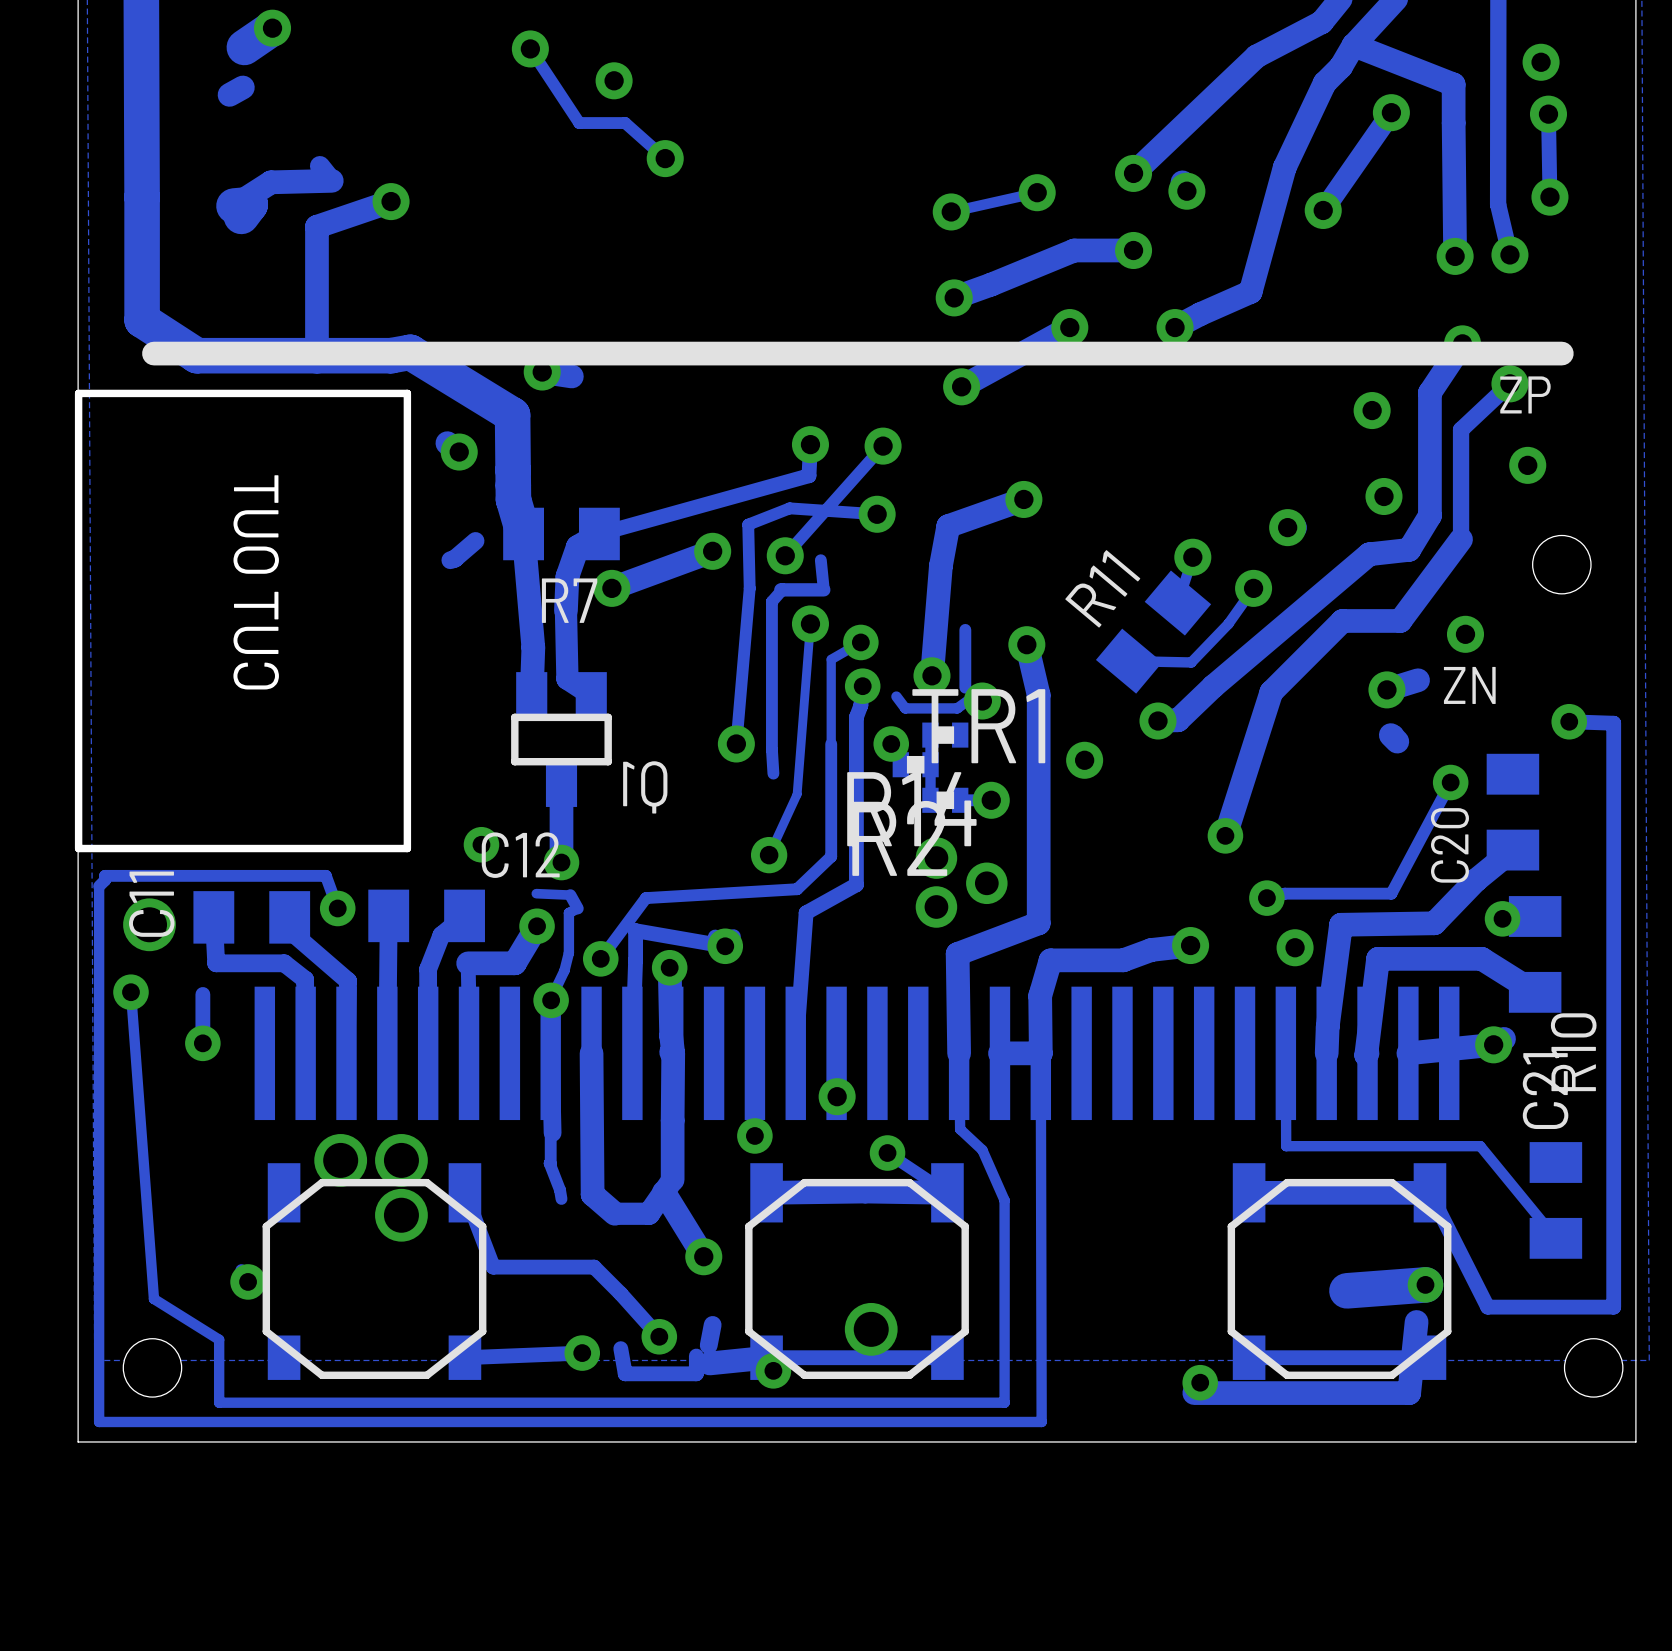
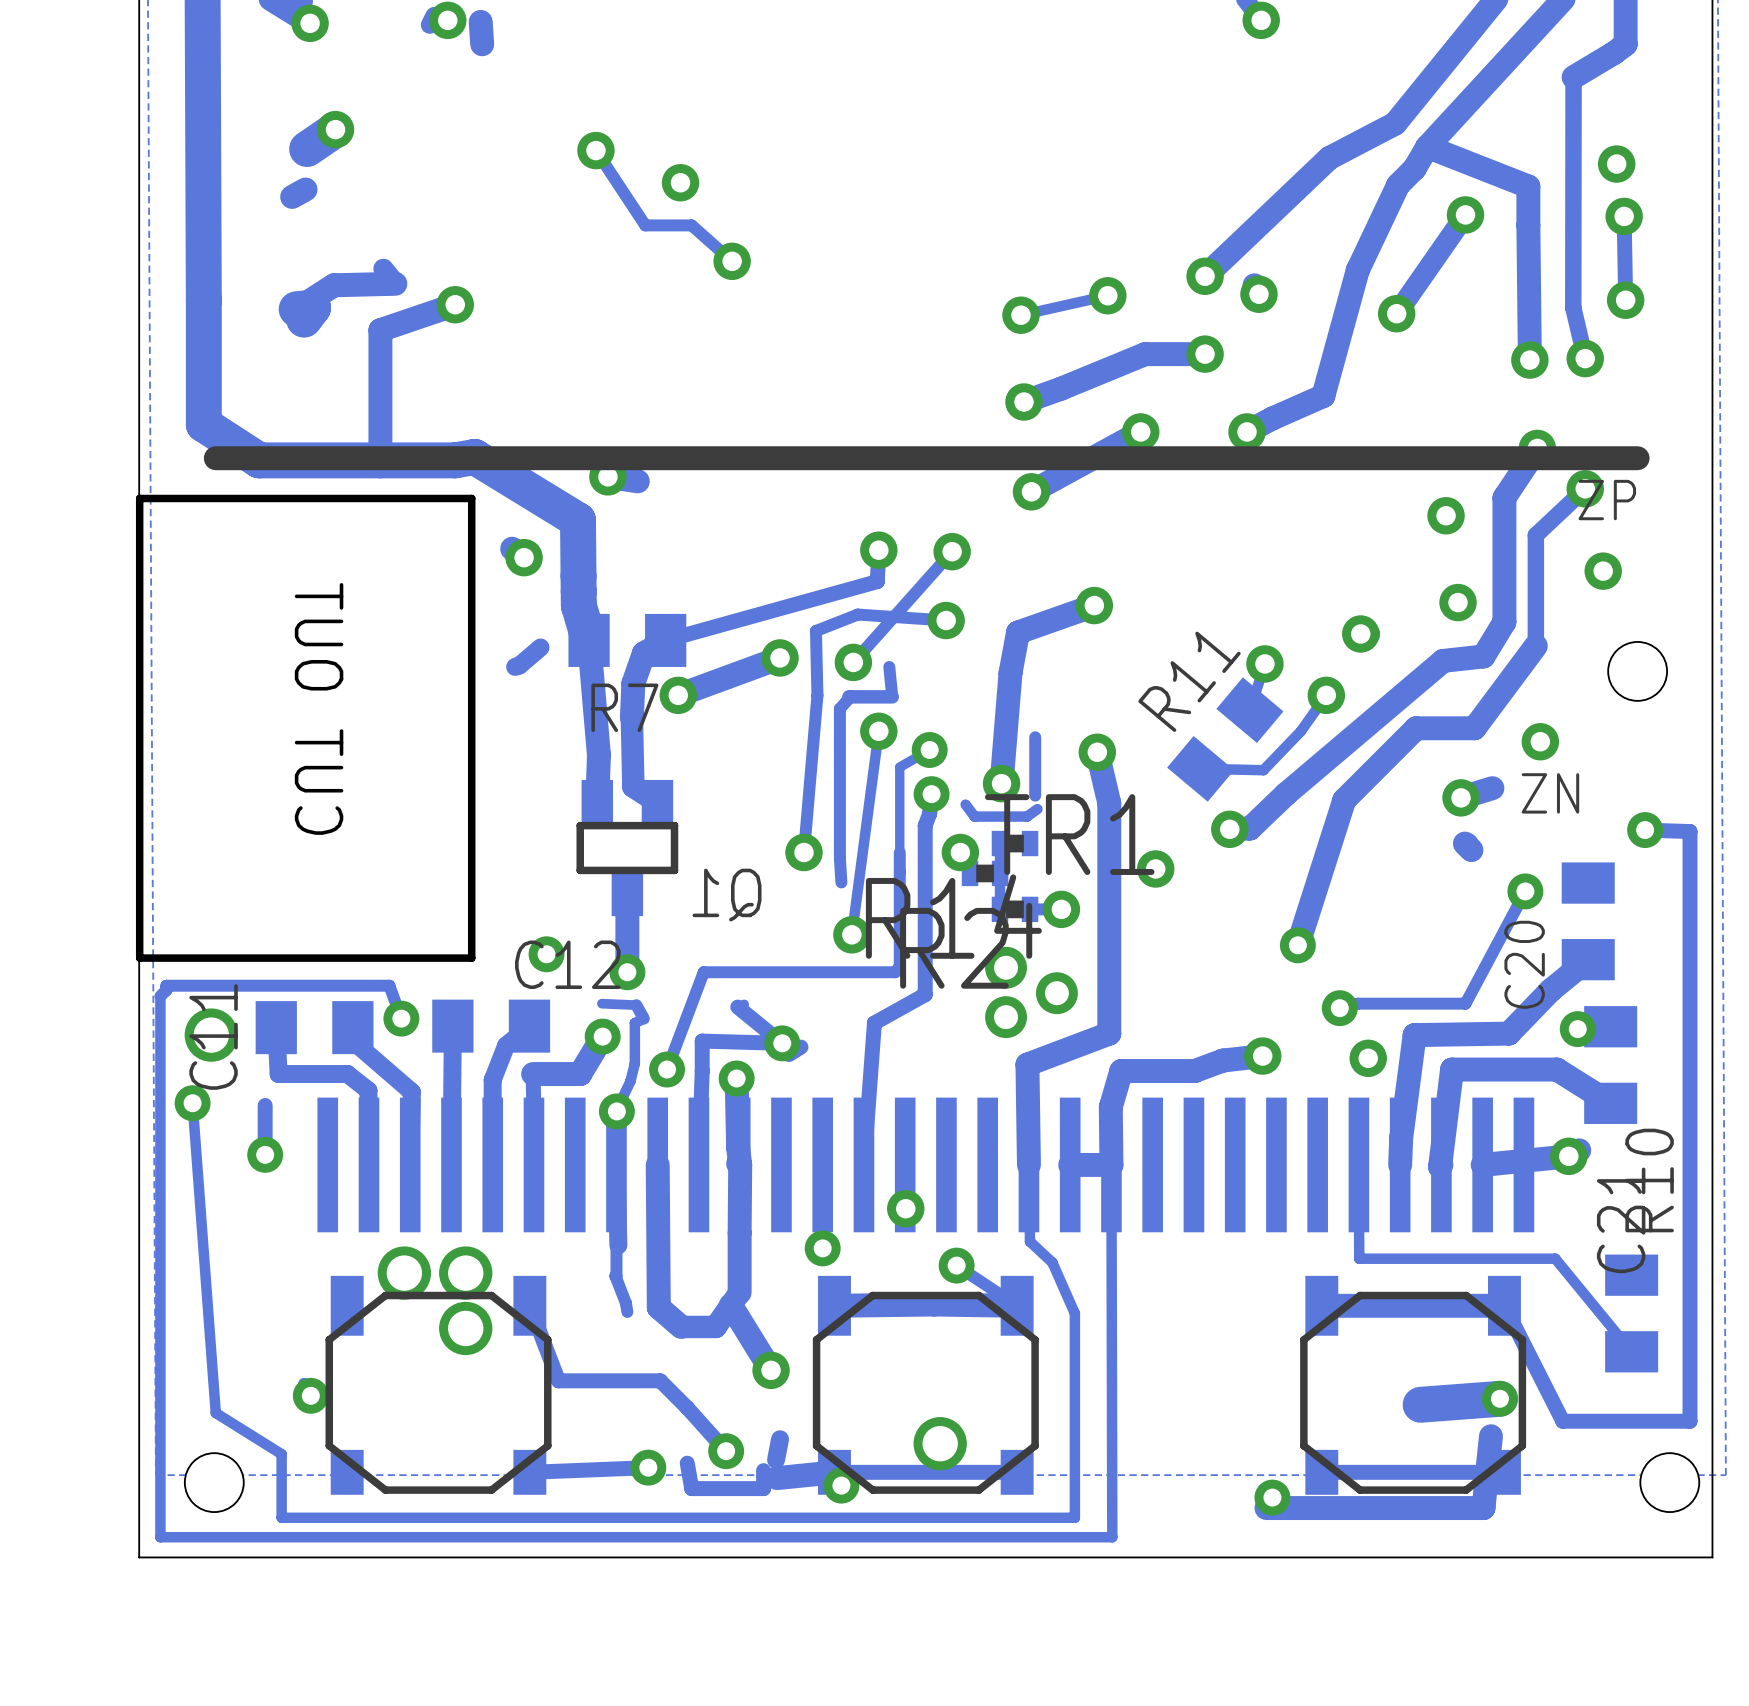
track: (810, 623) (797, 794) (769, 855) -> (878, 731) (851, 934)
via position: (982, 701) -> (960, 852)
via: (891, 743) -> none
via position: (769, 855) -> (851, 934)
track: (831, 856) (797, 889) (645, 898) (600, 958) -> (899, 966) (895, 972) (703, 972) (667, 1069)
track: (635, 930) (725, 946) (715, 937) (717, 938) -> (702, 1041) (782, 1043) (737, 1007) (744, 1004)
via position: (725, 946) -> (782, 1043)

